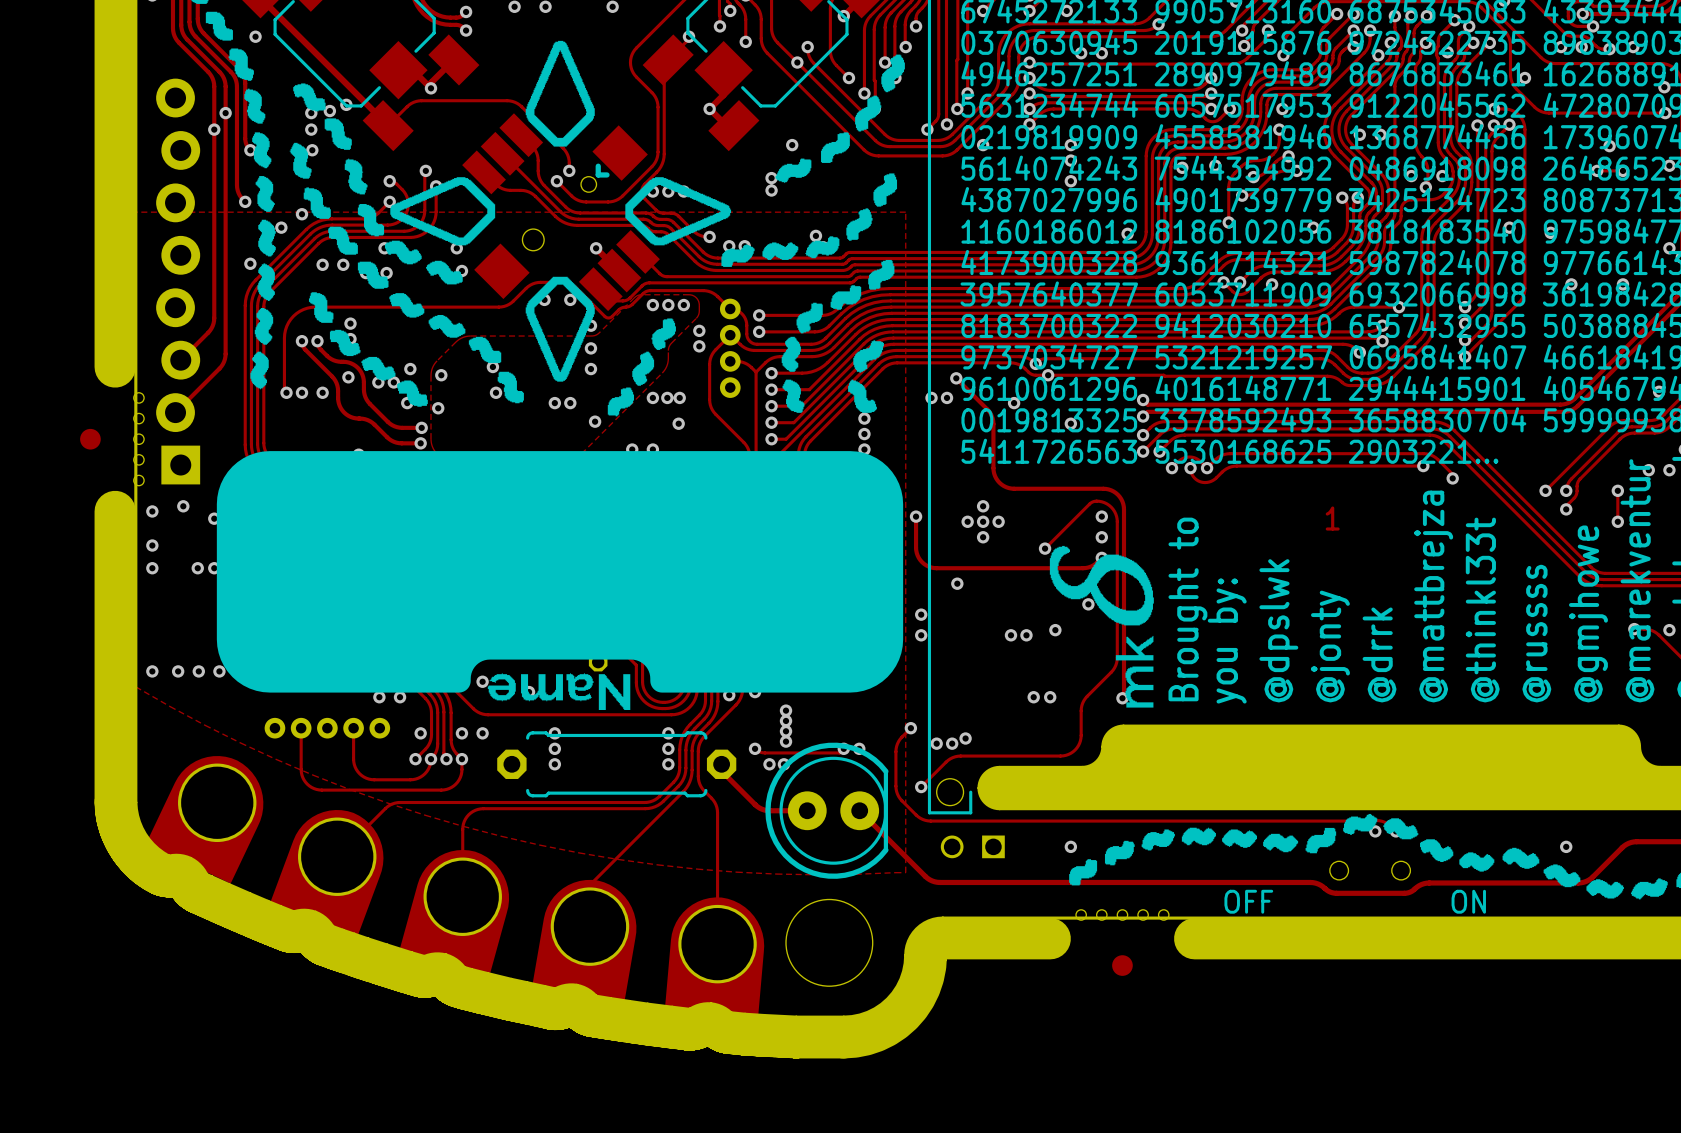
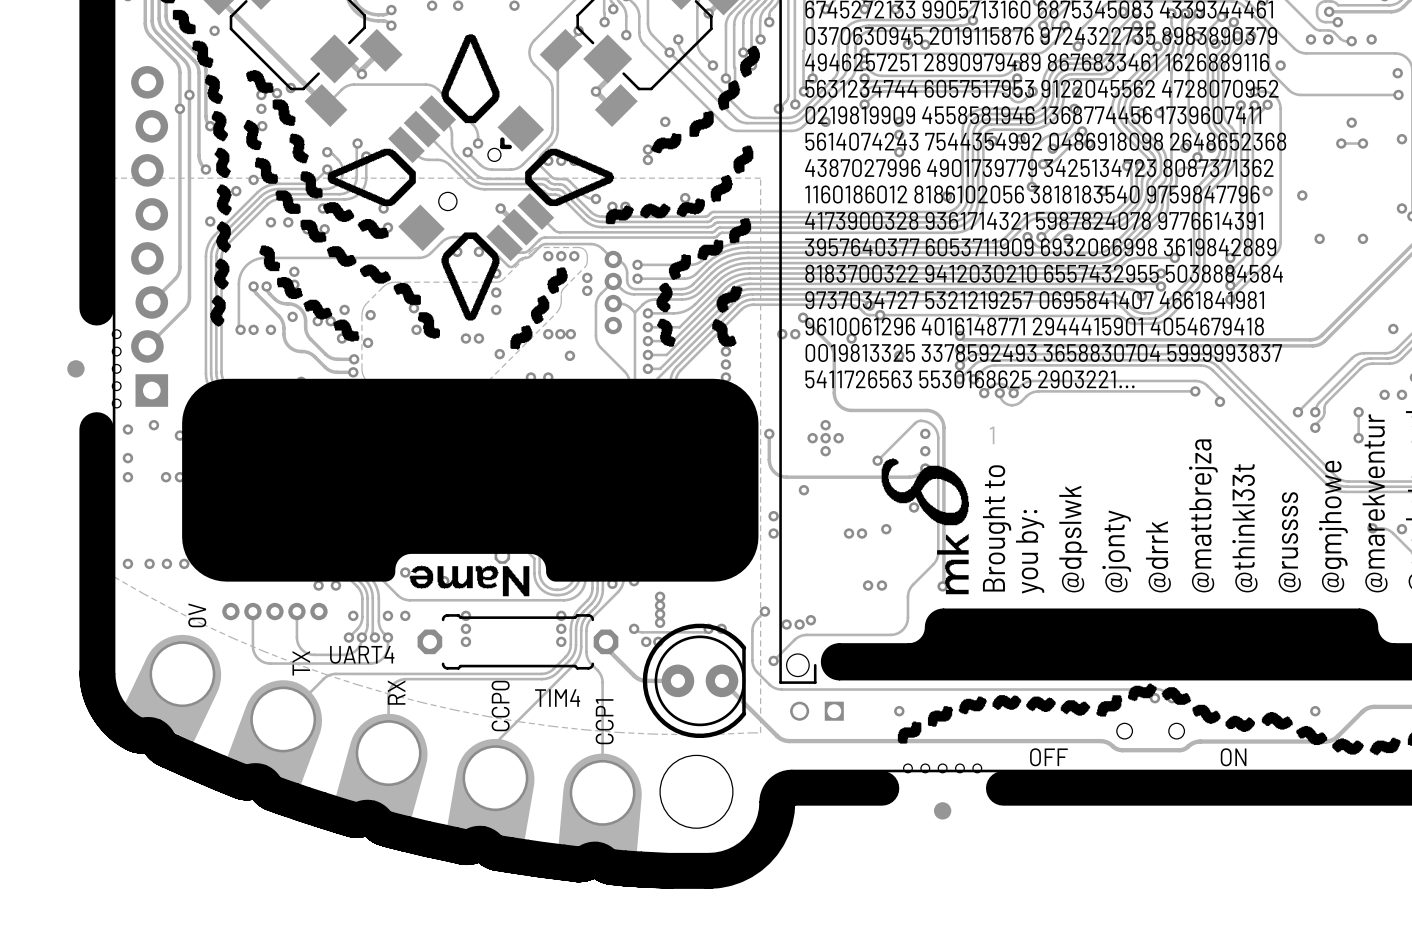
drawing position: (1332, 518) -> (992, 435)
text: none -> 0V (197, 615)
text: none -> UART4 (362, 654)
text: none -> TX (301, 663)
text: none -> RX (396, 692)
text: none -> TIM4 (557, 698)
text: none -> CCP0 (500, 706)
text: none -> CCP1 (604, 721)

